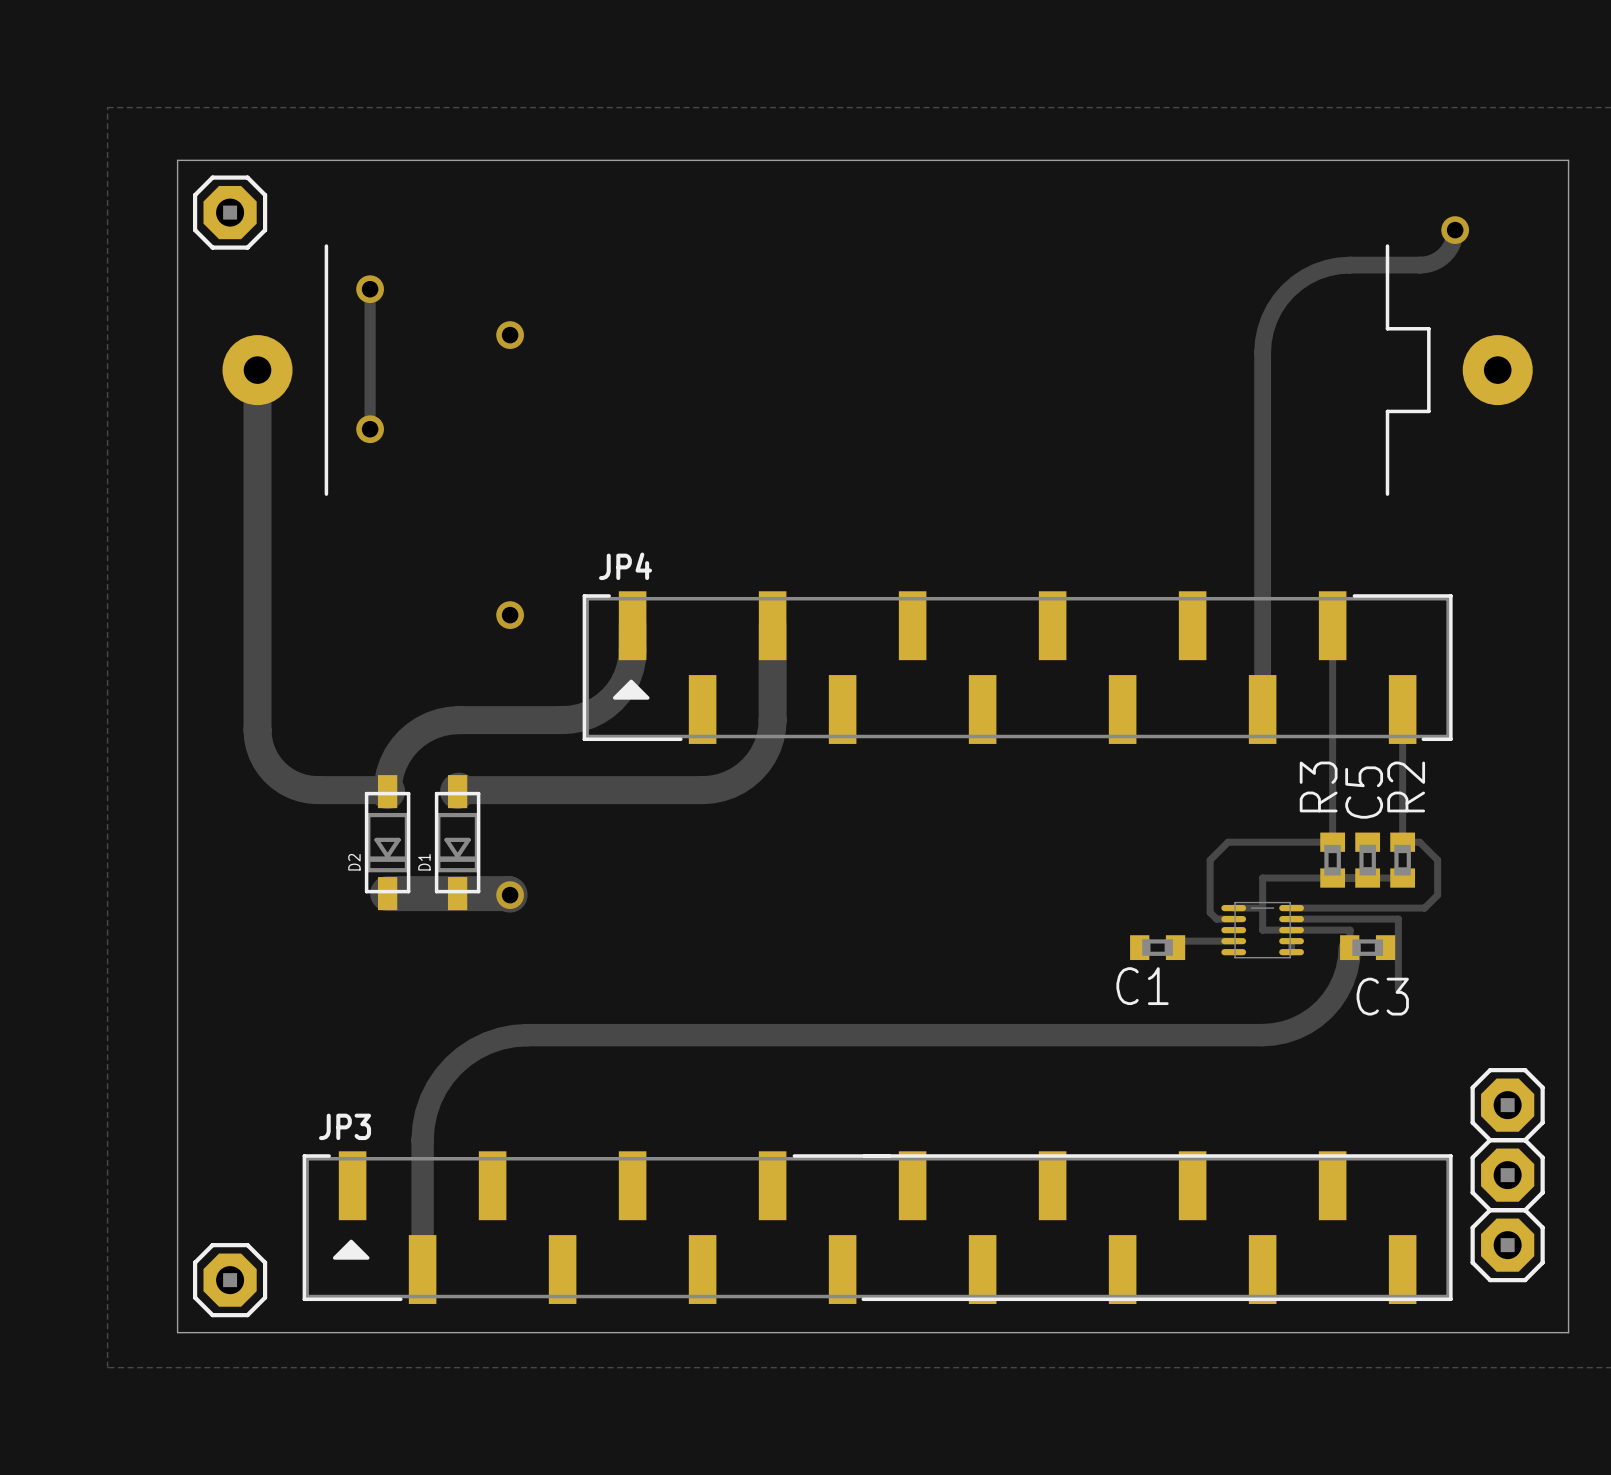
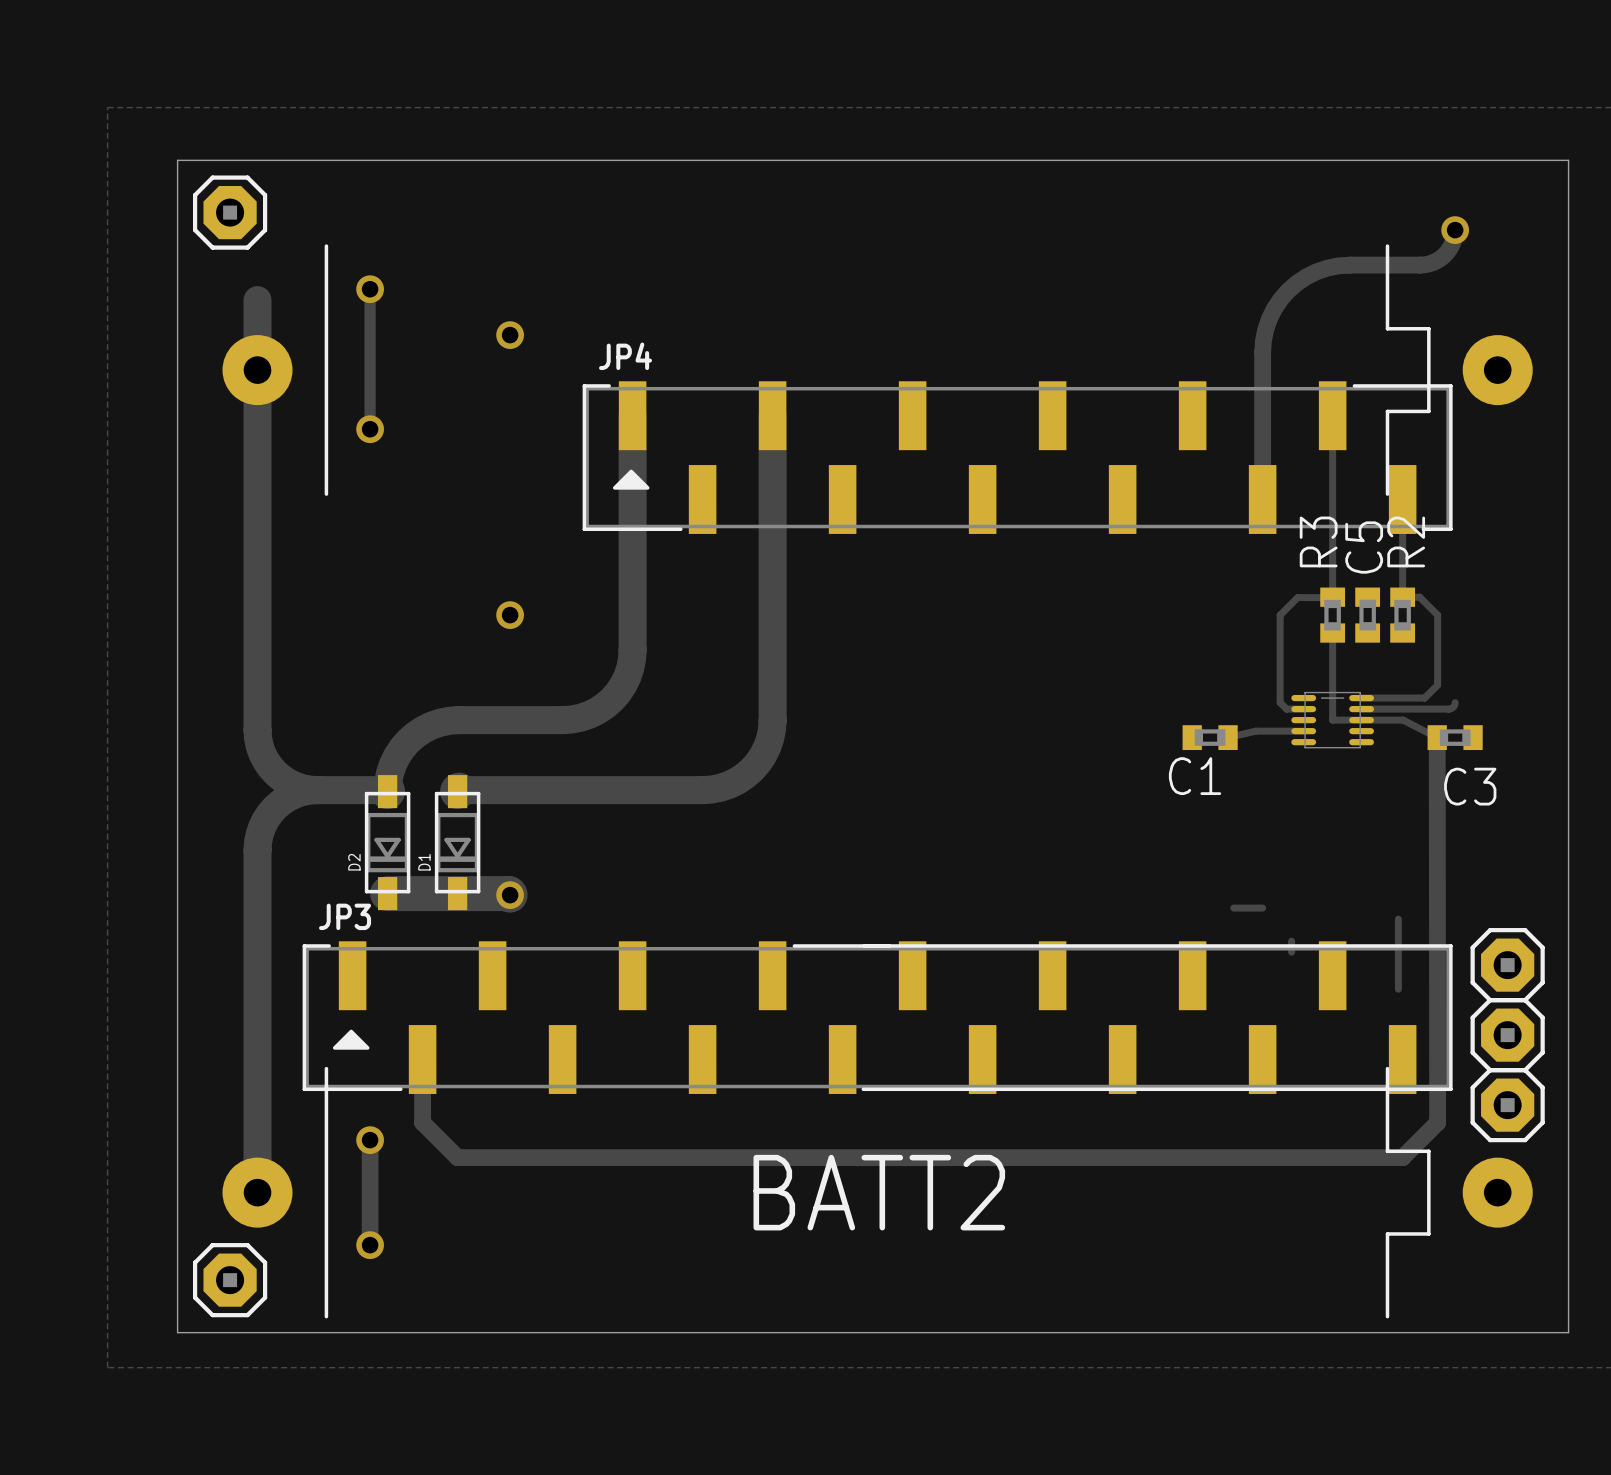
track: none -> (257, 300) (257, 370)
track: none -> (632, 415) (632, 625)
track: none -> (1332, 415) (1332, 597) (1297, 597) (1280, 615) (1280, 702) (1286, 709) (1303, 709)
track: (1262, 499) (1262, 709) -> (772, 415) (772, 625)
track: none -> (1402, 499) (1402, 597) (1419, 597) (1437, 615) (1437, 685) (1424, 698) (1361, 698)
JP4 position: (1017, 667) -> (1017, 457)
track: none -> (1455, 702) (1453, 707) (1449, 709) (1361, 709)
track: (1402, 709) (1402, 842) (1419, 842) (1437, 860) (1437, 895) (1424, 908) (1291, 908) -> none
track: (1332, 720) (1332, 842) (1228, 842) (1210, 860) (1210, 912) (1216, 919) (1233, 919) -> (1332, 720) (1403, 720) (1437, 737) (1437, 1122) (1402, 1157) (457, 1157) (422, 1122) (422, 1059)
track: none -> (1303, 731) (1255, 731) (1228, 737)
track: none -> (317, 790) (302, 792) (281, 802) (265, 820) (258, 842) (257, 1192)
R3 position: (1332, 860) -> (1332, 615)
C5 position: (1367, 860) -> (1367, 615)
R2 position: (1402, 860) -> (1402, 615)
track: (1402, 878) (1262, 878) (1262, 930) (1350, 930) (1346, 970) (1331, 1000) (1305, 1023) (1273, 1034) (527, 1035) (500, 1038) (487, 1043) (475, 1049) (453, 1065) (436, 1087) (426, 1112) (422, 1140) (422, 1269) -> none
track: (1291, 919) (1398, 919) -> none
part position: (1262, 930) -> (1332, 720)
track: (1233, 941) (1182, 941) (1175, 947) -> none
C1 position: (1157, 947) -> (1210, 737)
C3 position: (1367, 947) -> (1455, 737)
part: none -> (1507, 965)
part: none -> (1507, 1035)
track: none -> (370, 1140) (370, 1245)
via: none -> (370, 1140)
part: (1507, 1175) -> none
BATT2: none -> (877, 1192)
JP3 position: (877, 1227) -> (877, 1017)
via: none -> (370, 1245)
part: (1507, 1245) -> none

